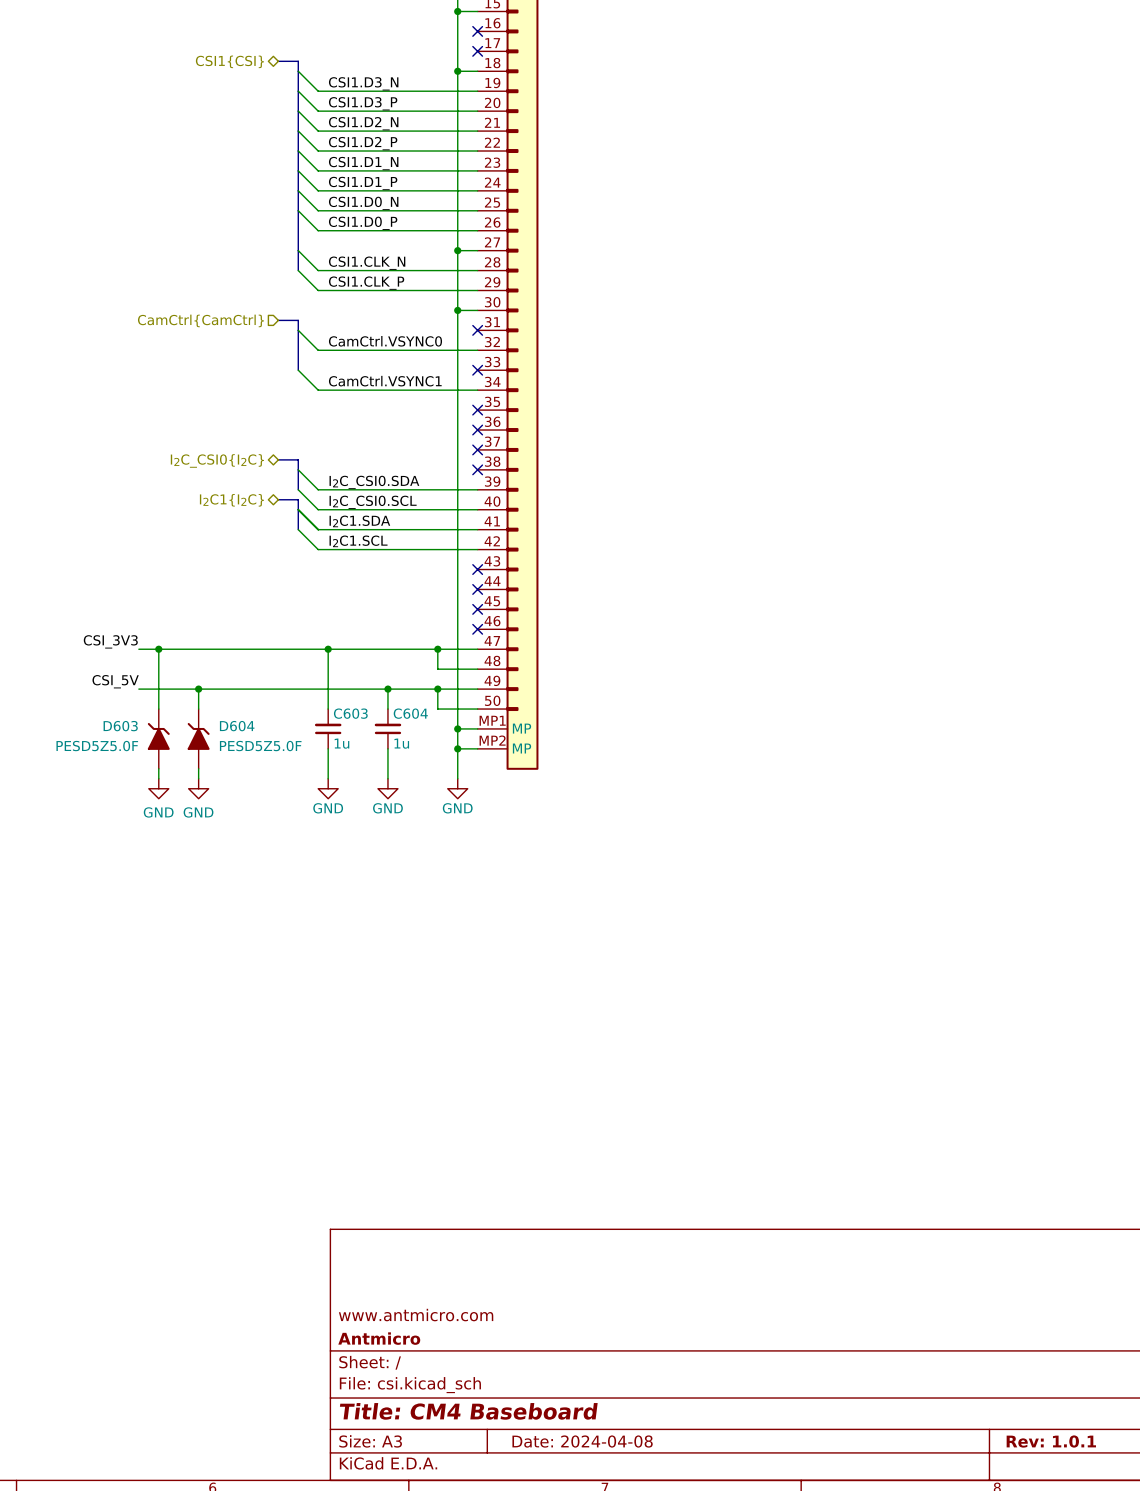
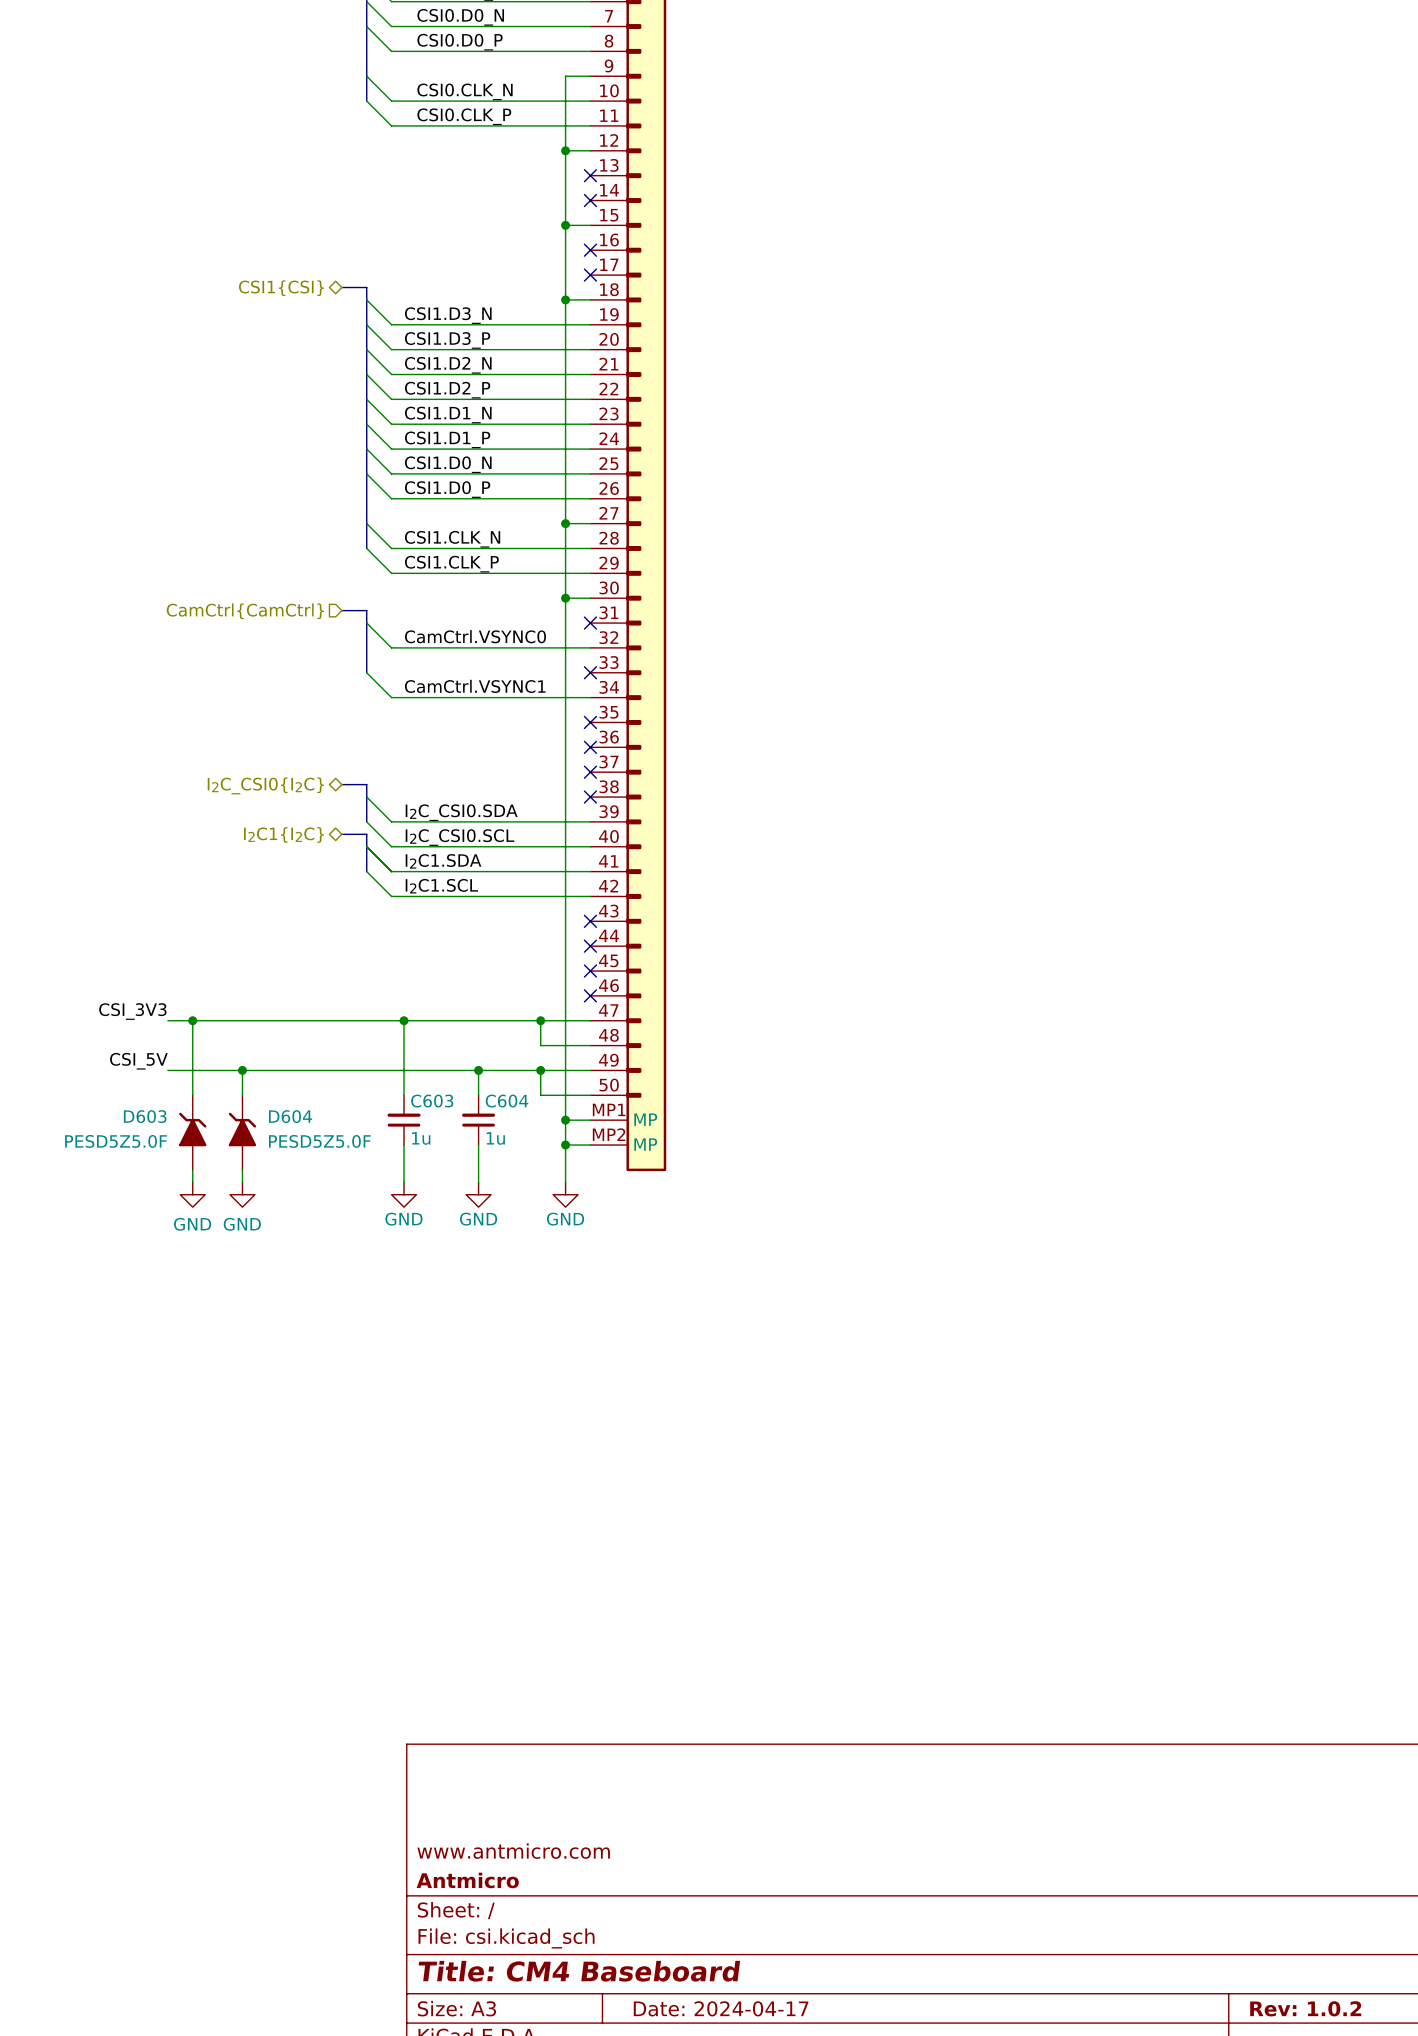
title block: Date: 2024-04-08 (582, 1441) -> Date: 2024-04-17 (721, 2008)
title block: Rev: 1.0.1 (1051, 1441) -> Rev: 1.0.2 (1305, 2008)

